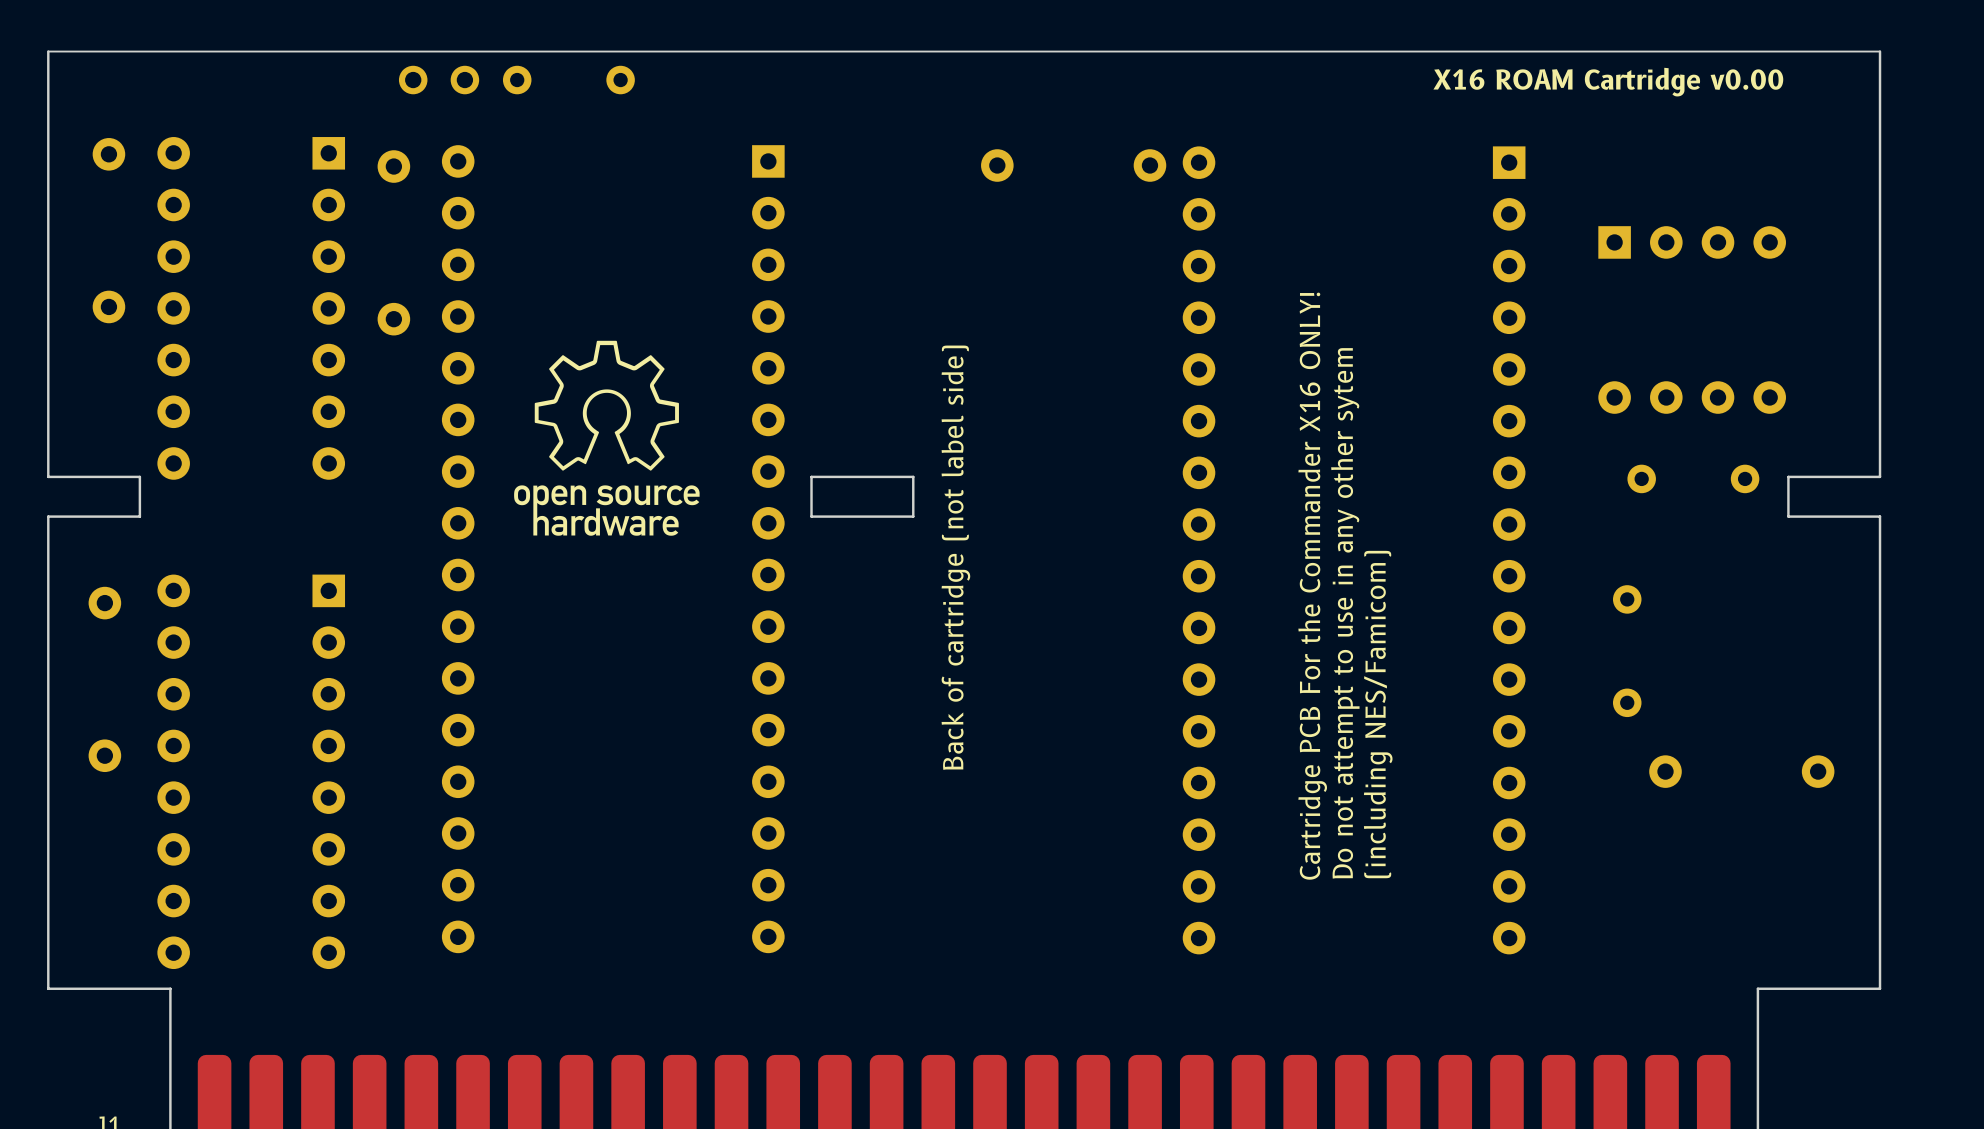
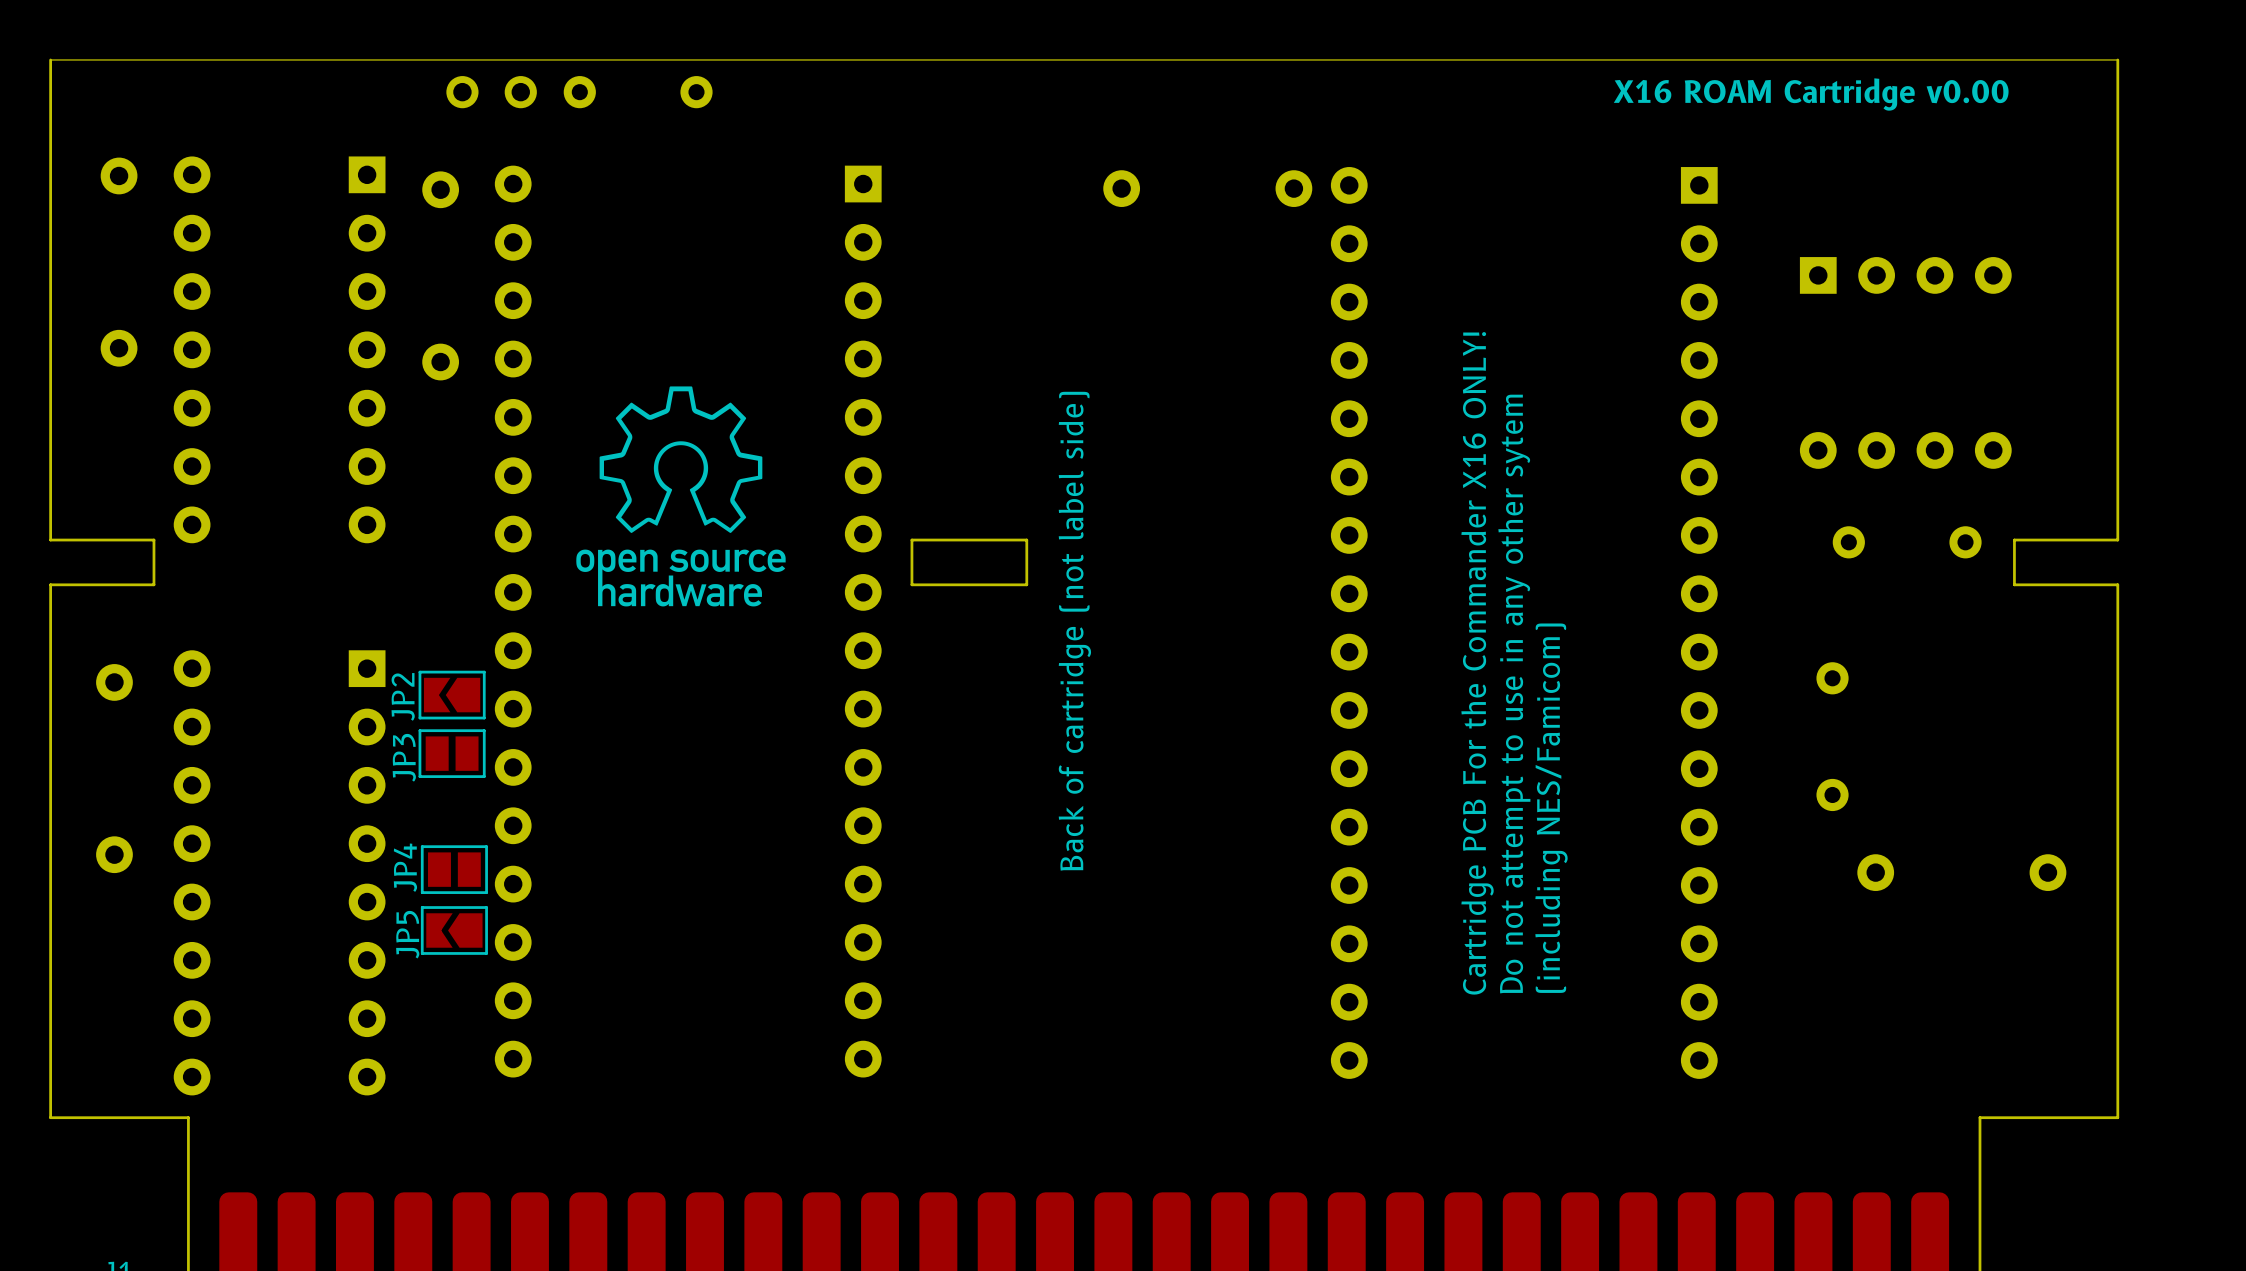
JP2: none -> (452, 695)
JP3: none -> (452, 753)
JP4: none -> (454, 869)
JP5: none -> (454, 930)

